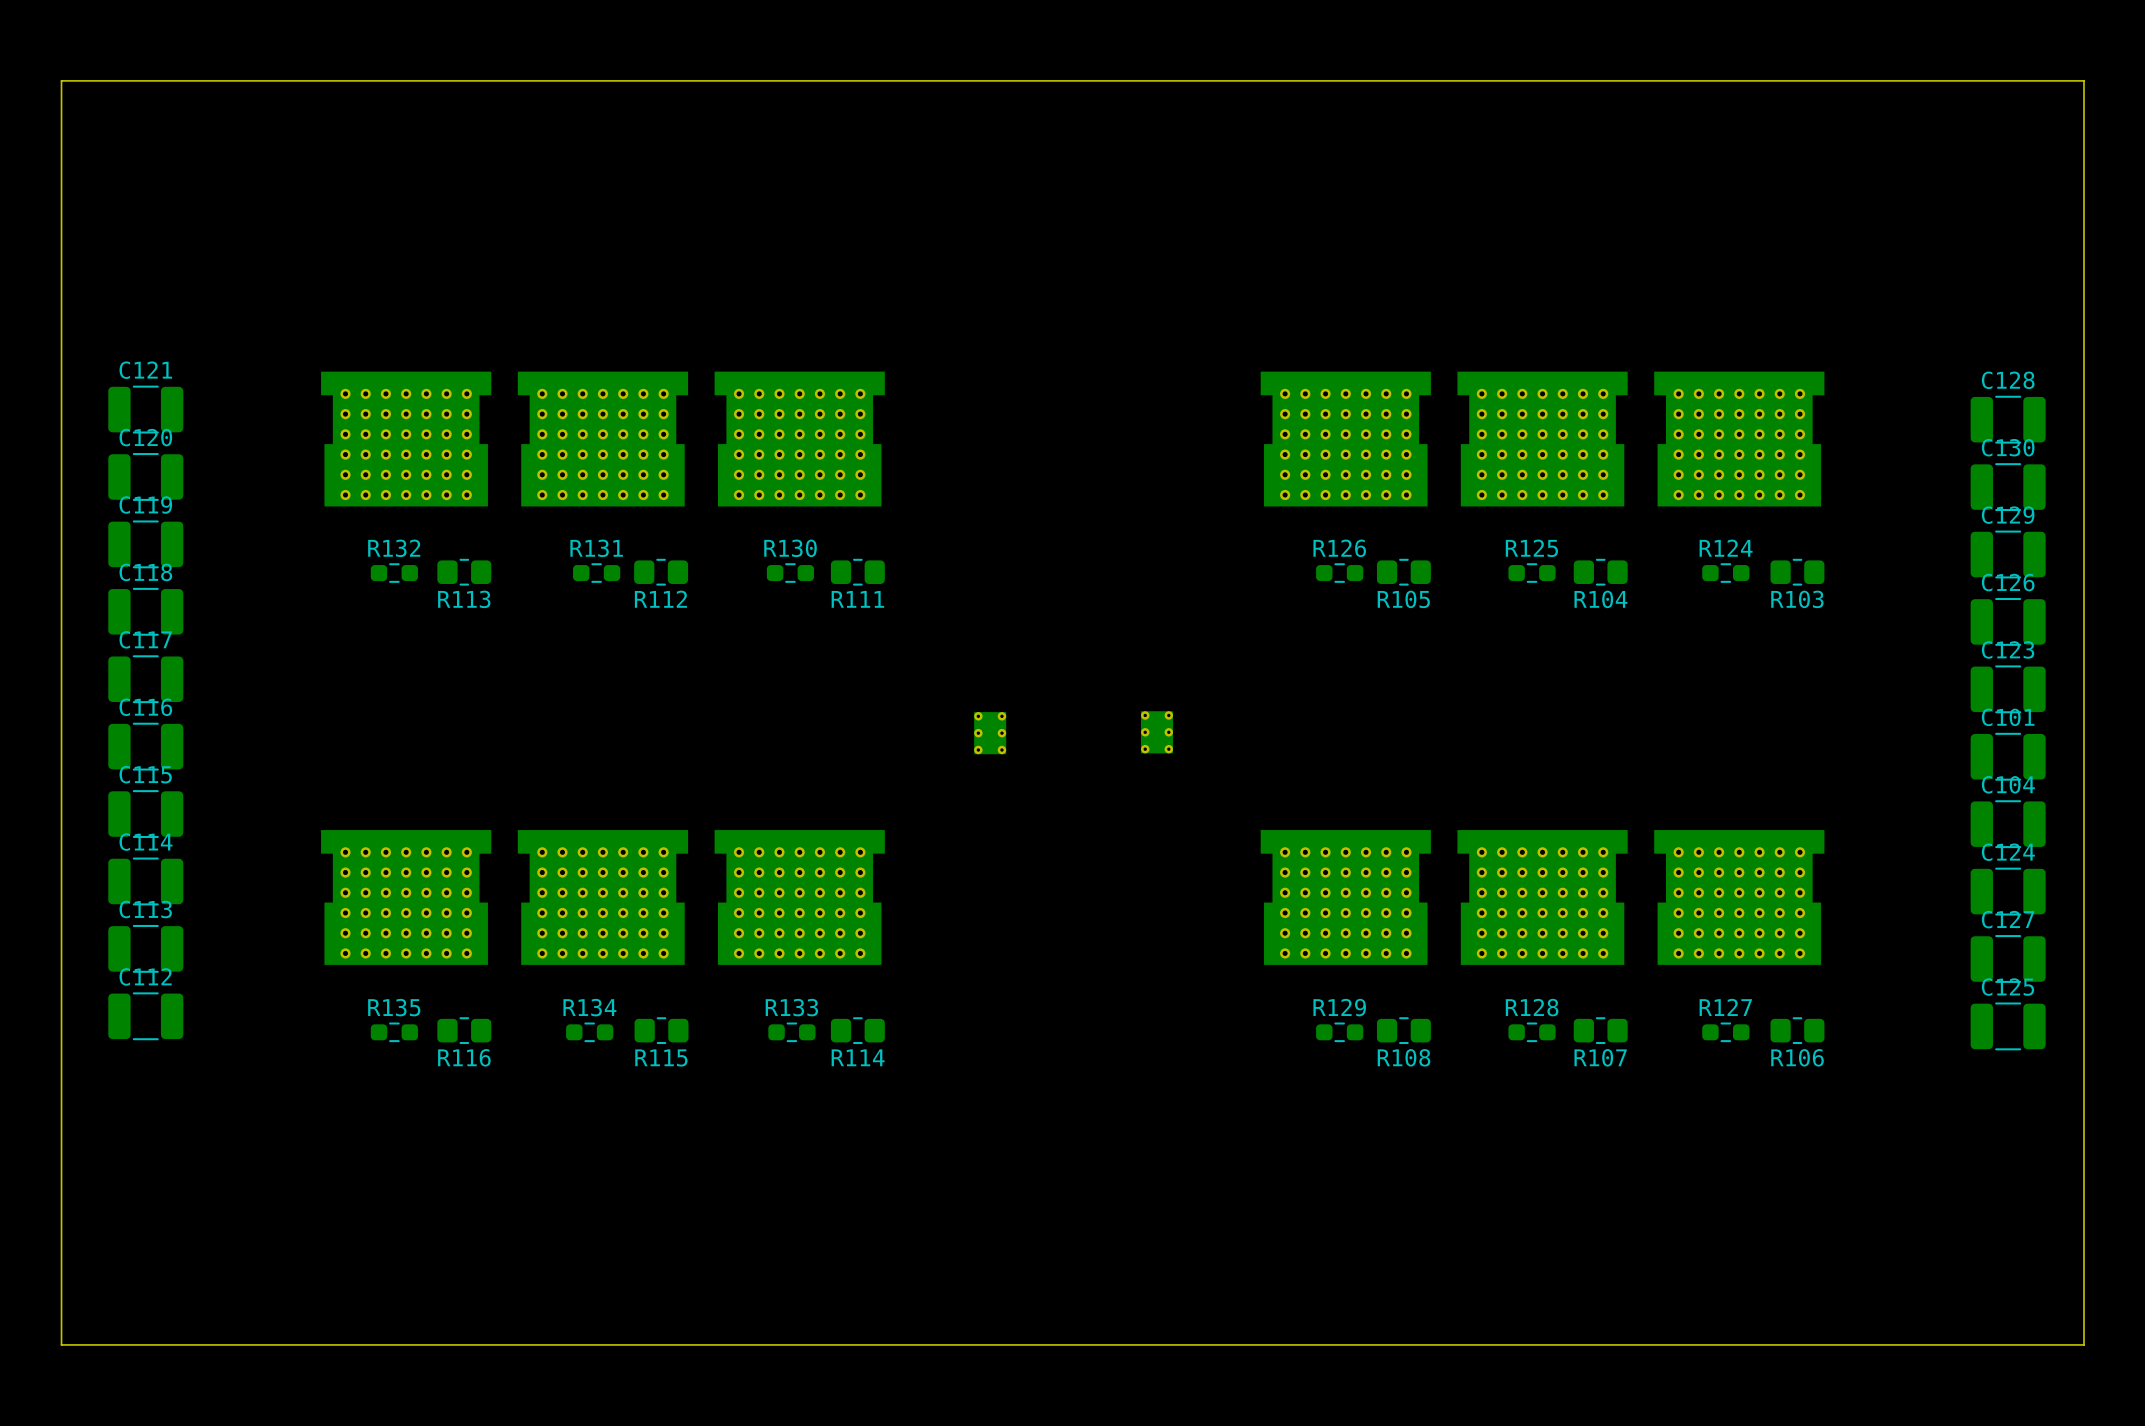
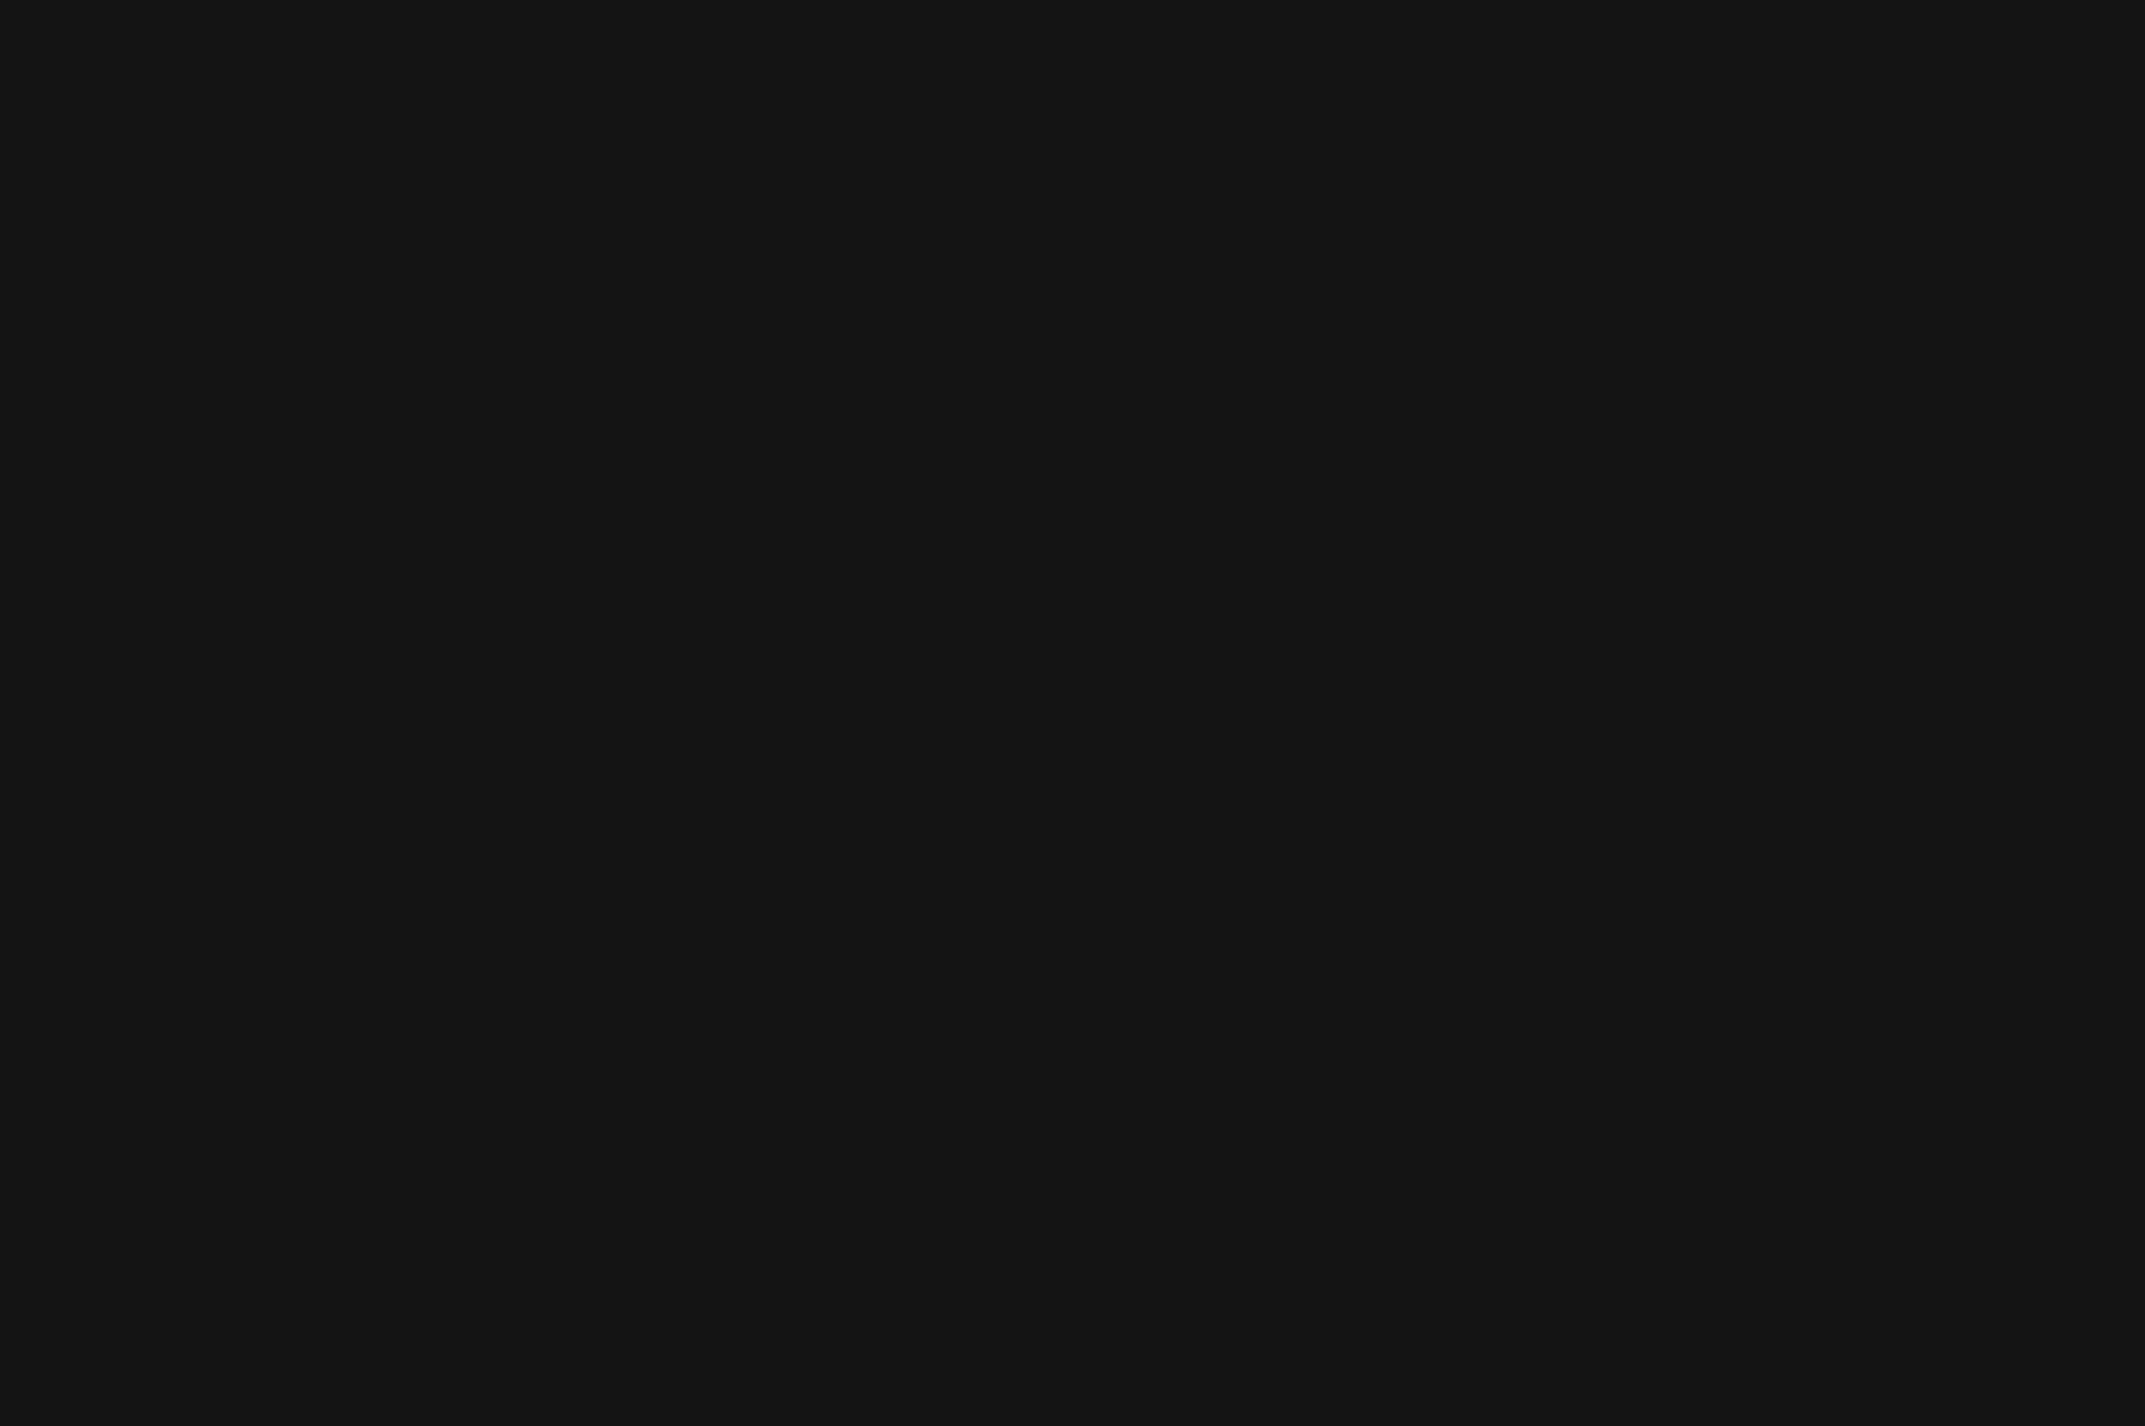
board edge: (2083, 80) (61, 80) (61, 1344) (2083, 1344) (2083, 80) -> none
C121: (145, 409) -> none
C128: (2008, 419) -> none
part: (406, 439) -> none
part: (602, 439) -> none
part: (799, 439) -> none
part: (1345, 439) -> none
part: (1542, 439) -> none
part: (1739, 439) -> none
C120: (145, 476) -> none
C130: (2008, 487) -> none
C119: (145, 544) -> none
C129: (2008, 554) -> none
R113: (464, 572) -> none
R112: (661, 572) -> none
R111: (857, 572) -> none
R105: (1403, 572) -> none
R104: (1600, 572) -> none
R103: (1797, 572) -> none
R132: (394, 573) -> none
R131: (596, 573) -> none
R130: (790, 573) -> none
R126: (1339, 573) -> none
R125: (1532, 573) -> none
R124: (1725, 573) -> none
C118: (145, 611) -> none
C126: (2008, 621) -> none
C117: (145, 679) -> none
C123: (2008, 689) -> none
part: (1157, 732) -> none
part: (990, 733) -> none
C116: (145, 746) -> none
C101: (2008, 756) -> none
C115: (145, 814) -> none
C104: (2008, 824) -> none
C114: (145, 881) -> none
C124: (2008, 891) -> none
part: (406, 897) -> none
part: (602, 897) -> none
part: (799, 897) -> none
part: (1345, 897) -> none
part: (1542, 897) -> none
part: (1739, 897) -> none
C113: (145, 948) -> none
C127: (2008, 958) -> none
C112: (145, 1016) -> none
C125: (2008, 1026) -> none
R116: (464, 1030) -> none
R115: (661, 1030) -> none
R114: (857, 1030) -> none
R108: (1403, 1030) -> none
R107: (1600, 1030) -> none
R106: (1797, 1030) -> none
R135: (394, 1032) -> none
R134: (589, 1032) -> none
R133: (791, 1032) -> none
R129: (1339, 1032) -> none
R128: (1532, 1032) -> none
R127: (1725, 1032) -> none

